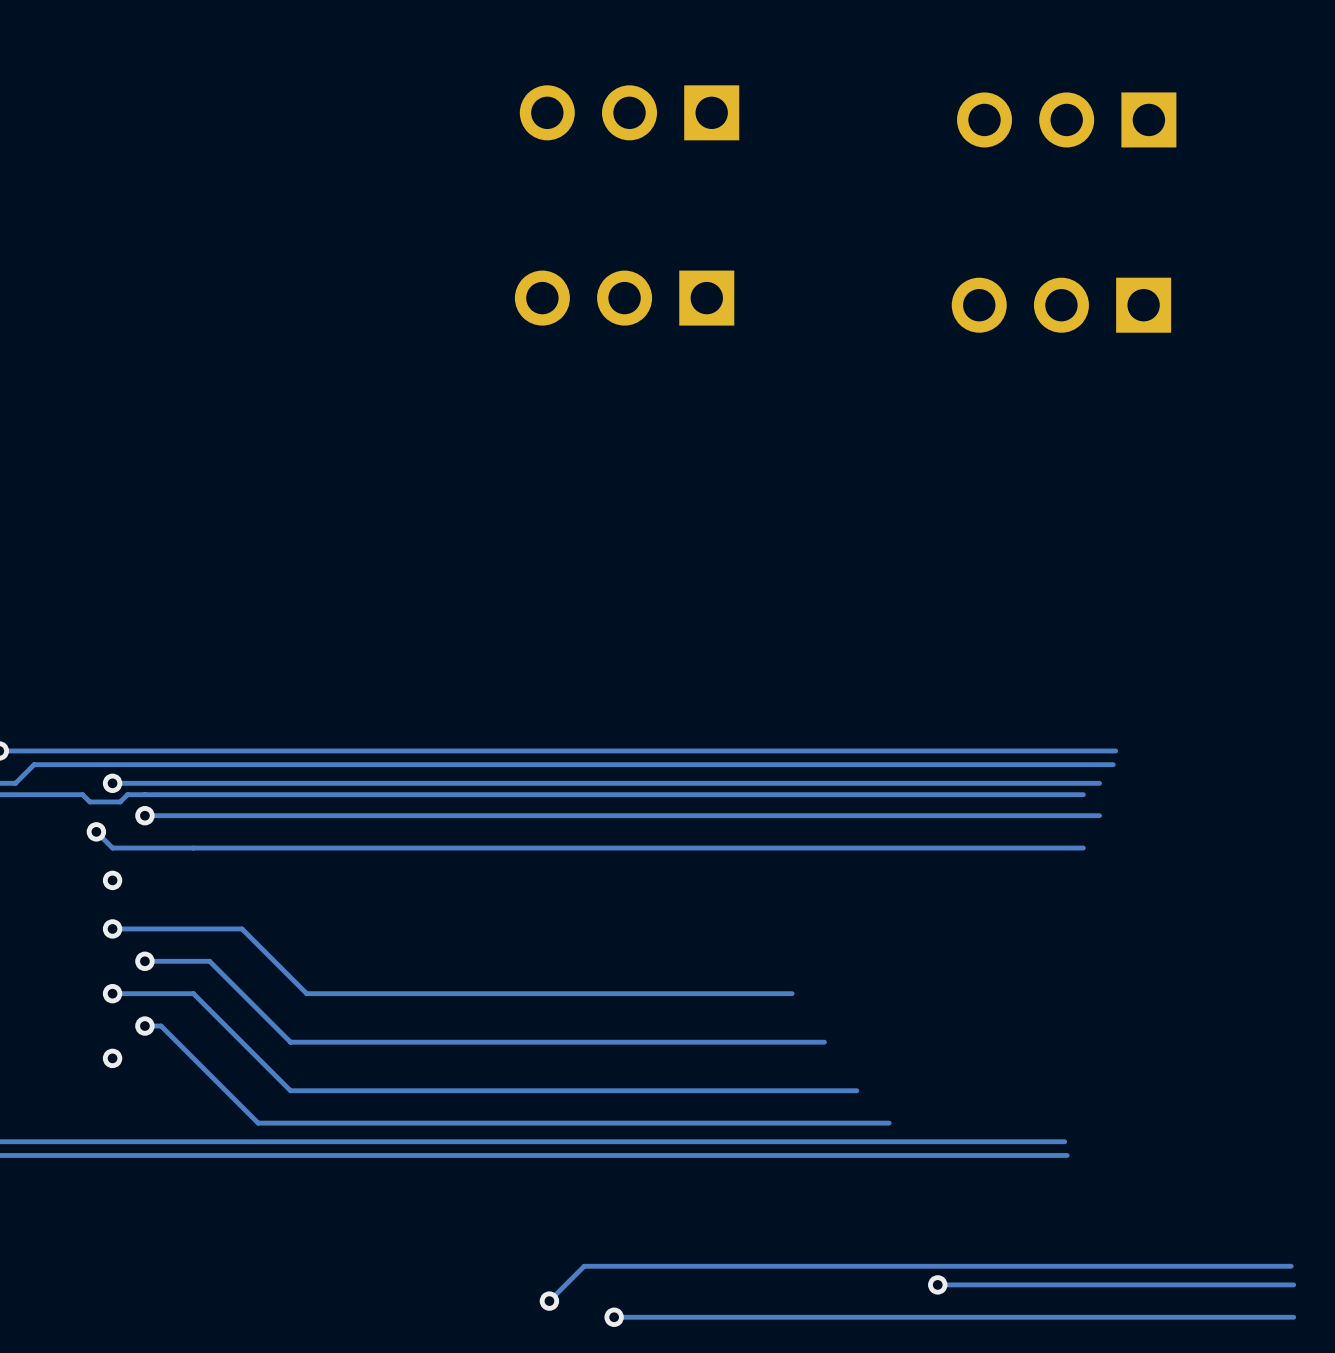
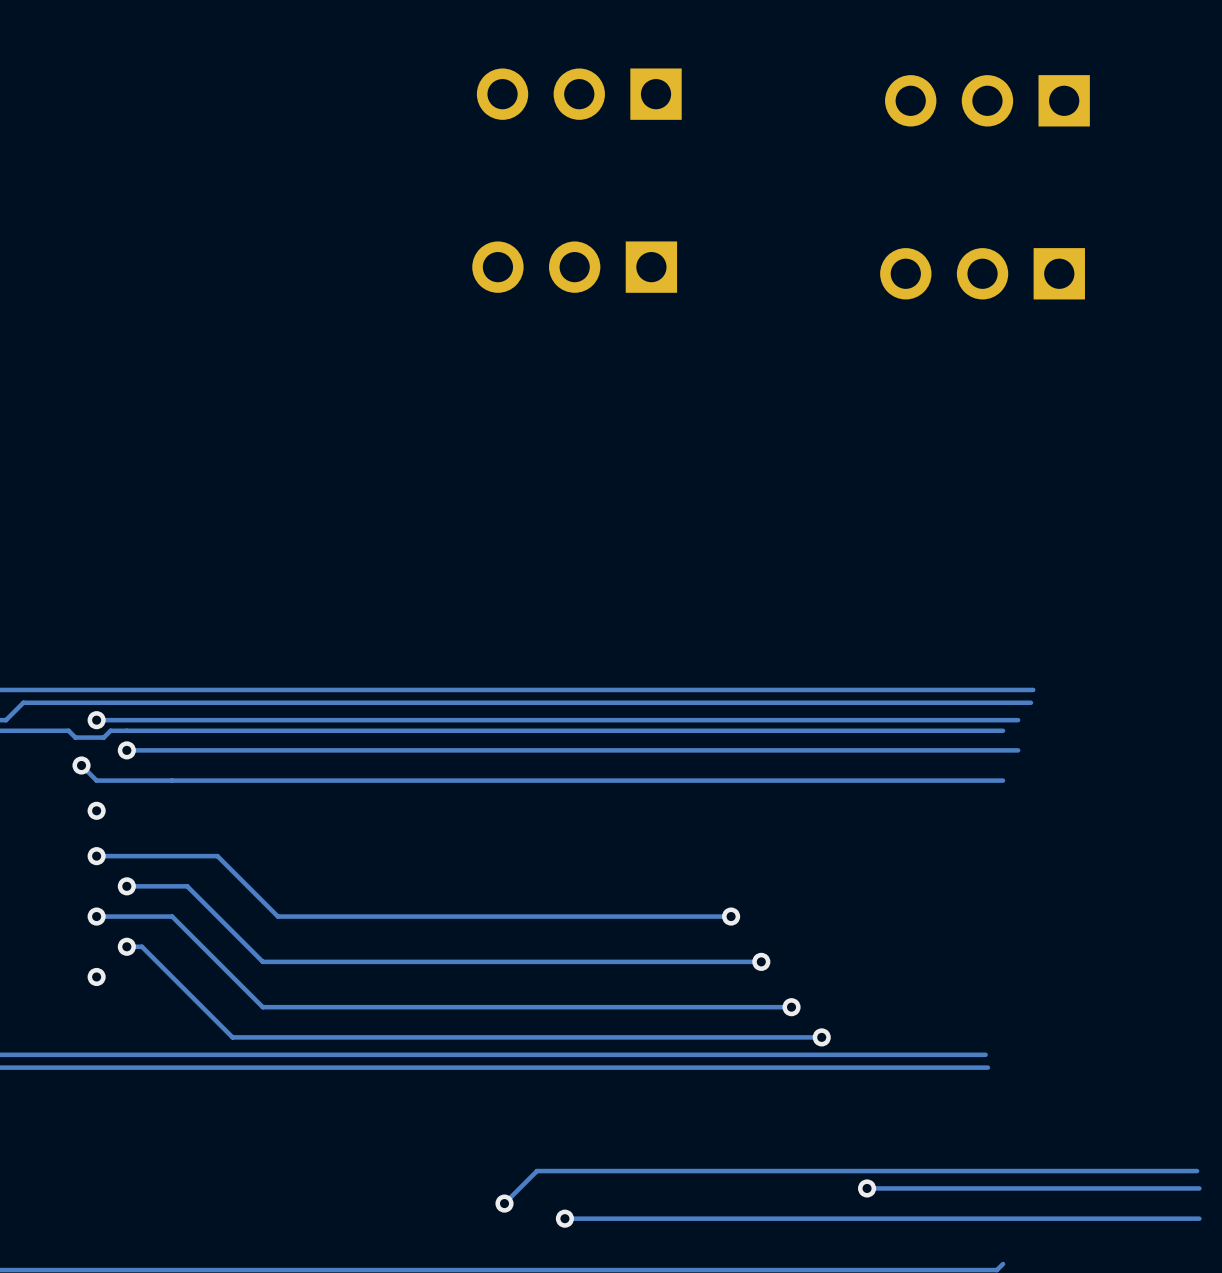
via: none -> (731, 916)
via: none -> (761, 961)
via: none -> (791, 1007)
via: none -> (821, 1037)

